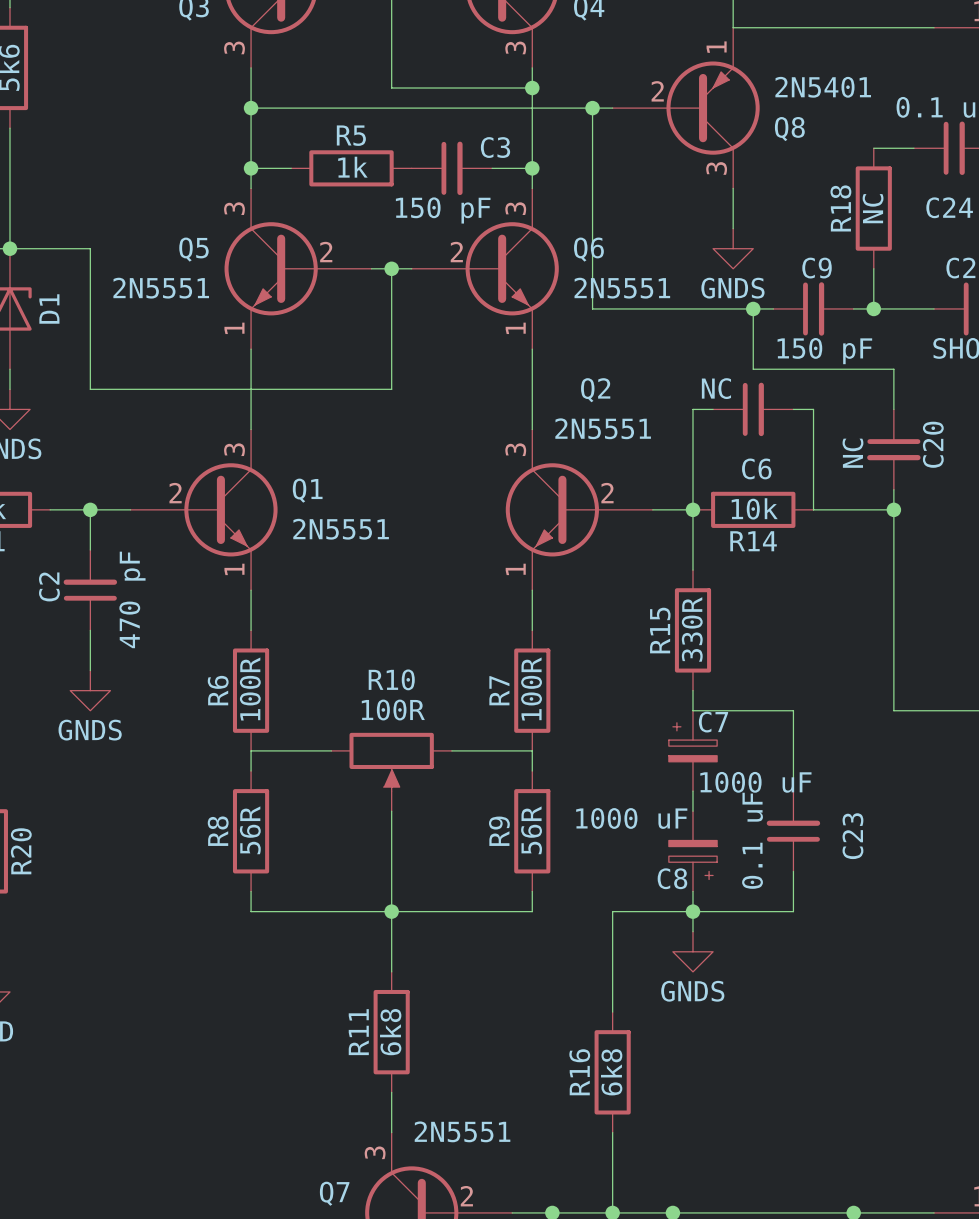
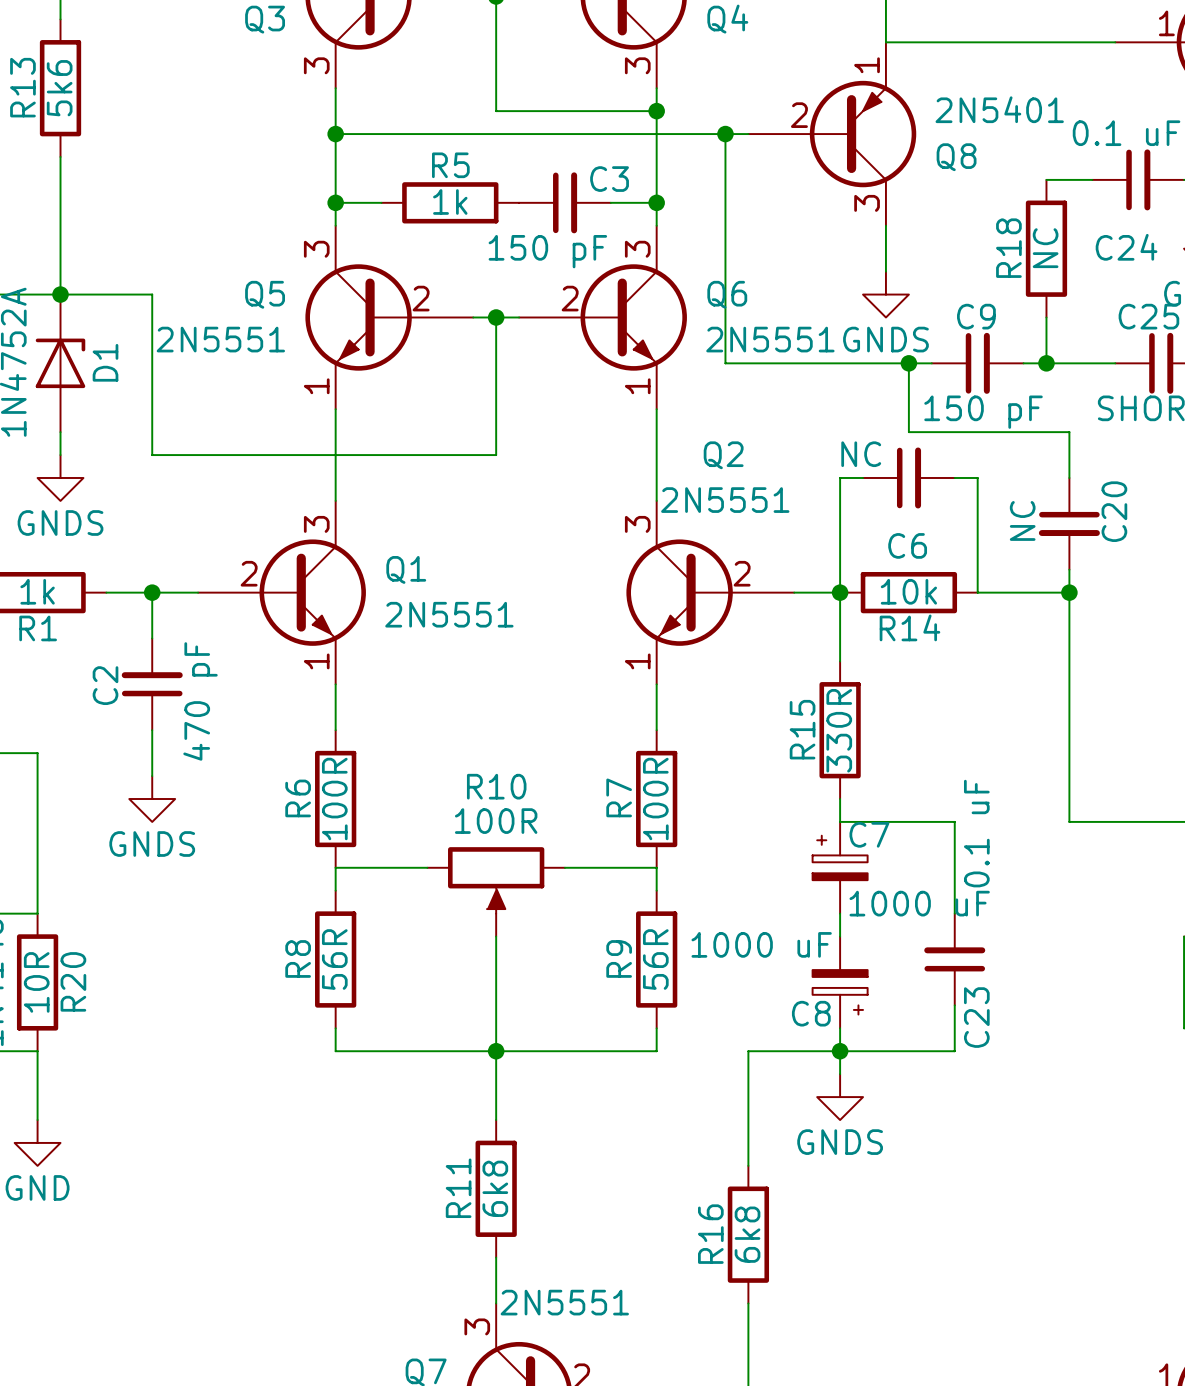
C23 name position: C23 (852, 836) -> C23 (976, 1017)
C23 value position: 0.1 uF (752, 840) -> 0.1 uF (976, 833)

